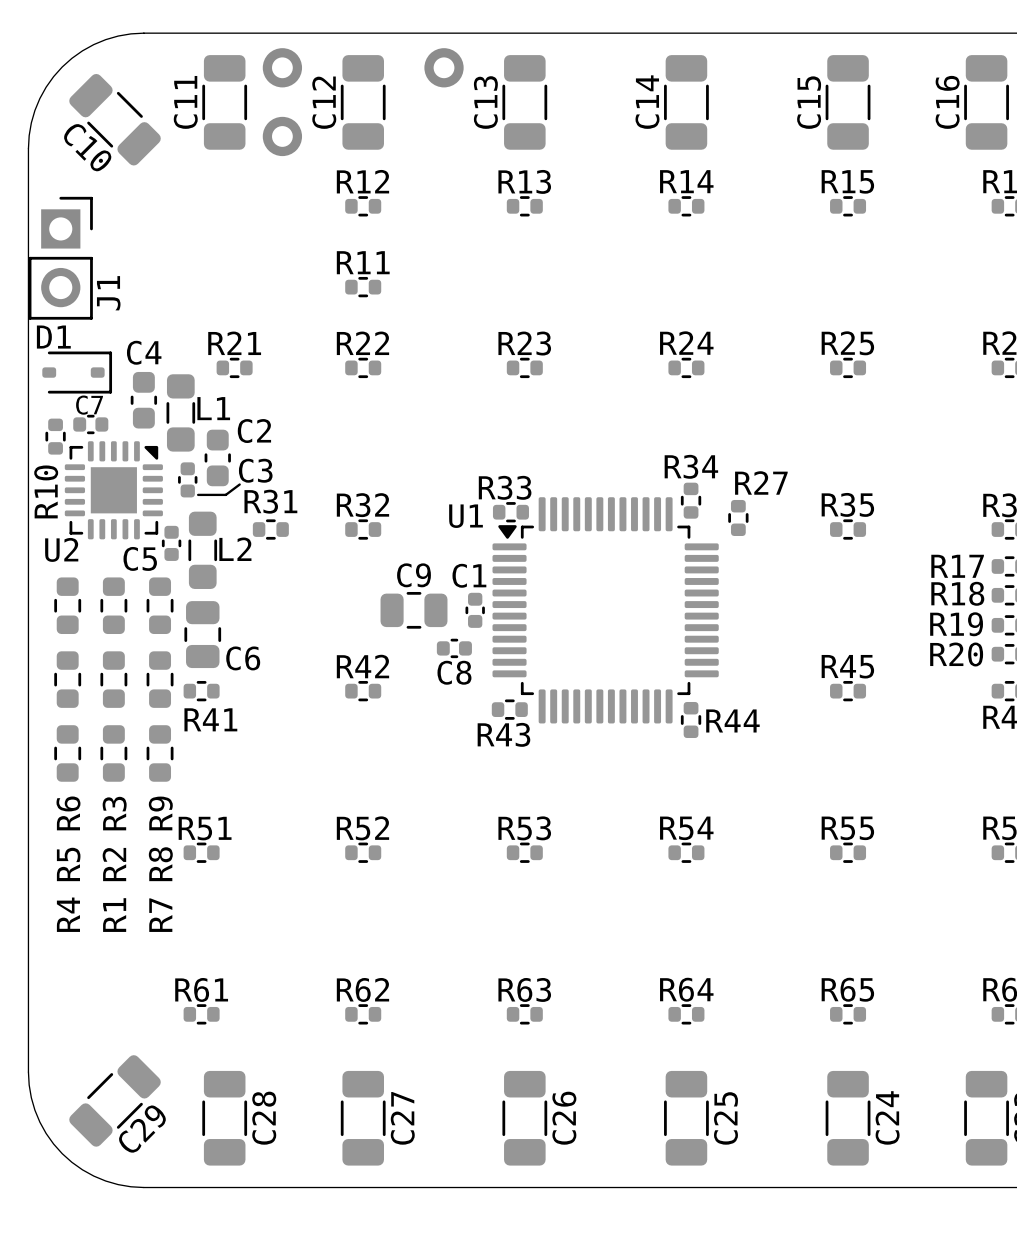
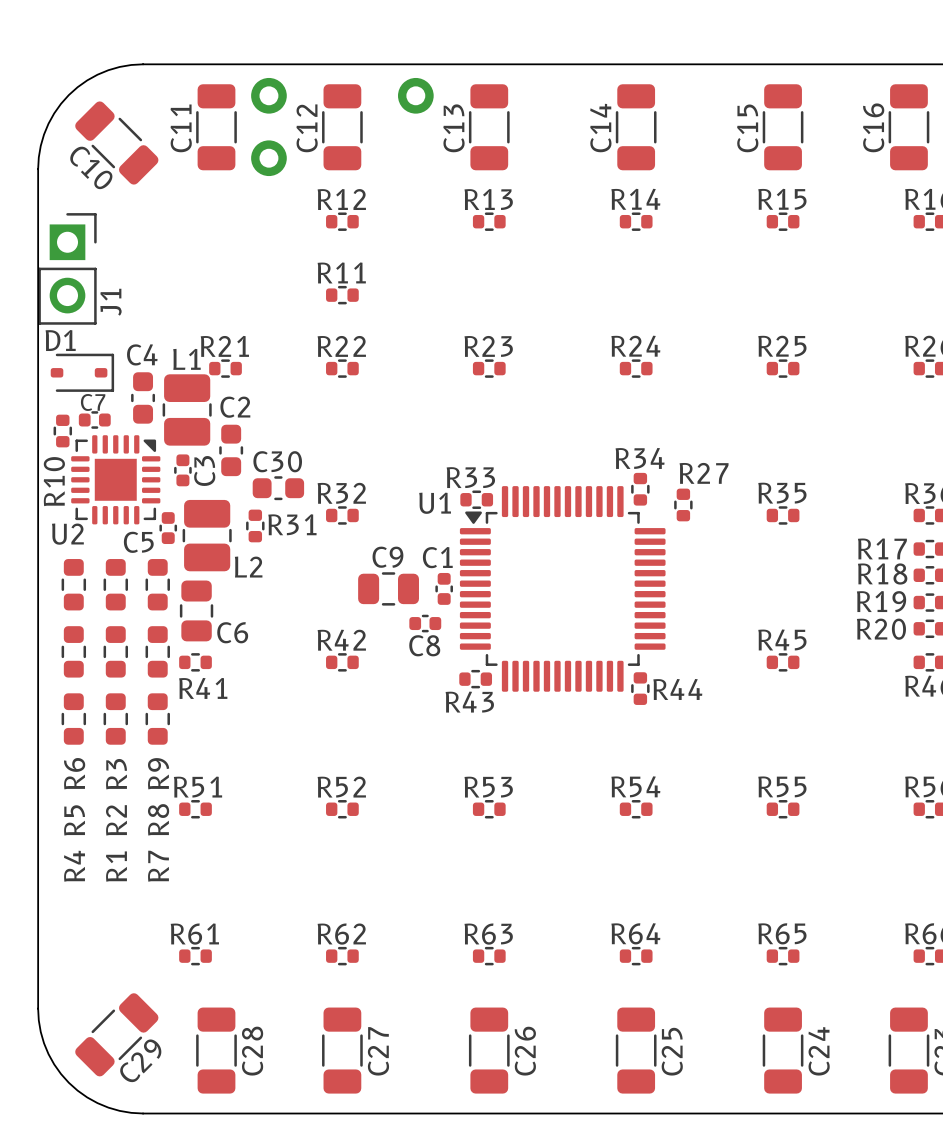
L1 footprint: [166, 374, 196, 452] -> [162, 374, 212, 446]
L1 name position: L1 (213, 408) -> L1 (186, 359)
C2 name position: C2 (254, 431) -> C2 (235, 407)
C2 position: (217, 457) -> (231, 450)
C3 name rotation: 0° (255, 470) -> 90° counterclockwise (204, 470)
line: (239, 484) (225, 494) (198, 494) -> none
C30: none -> (278, 488)
L2 footprint: [188, 511, 218, 589] -> [182, 499, 232, 572]
R31 rotation: 0° (270, 529) -> 90° clockwise (255, 525)

